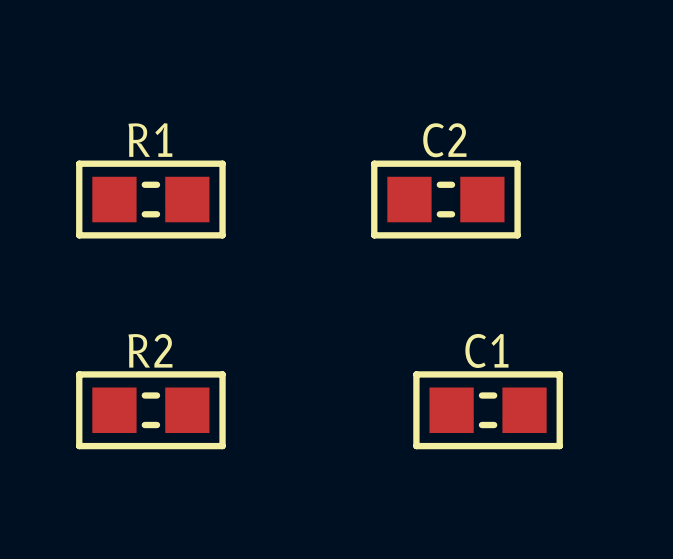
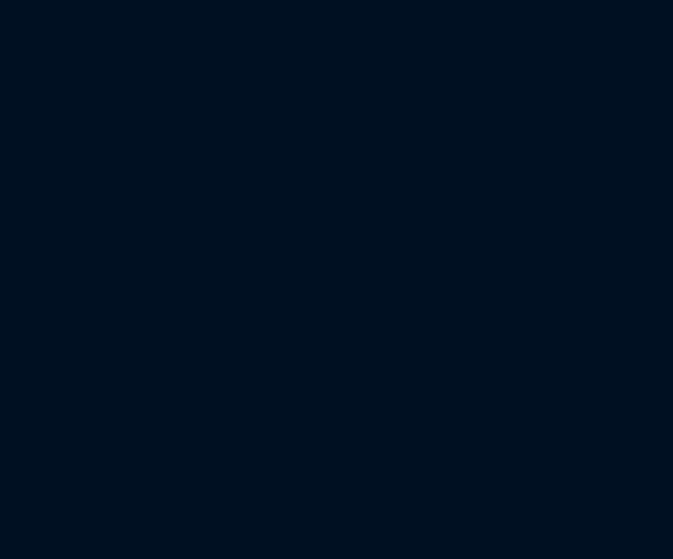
R1: (150, 199) -> none
C2: (445, 199) -> none
R2: (150, 410) -> none
C1: (488, 410) -> none

